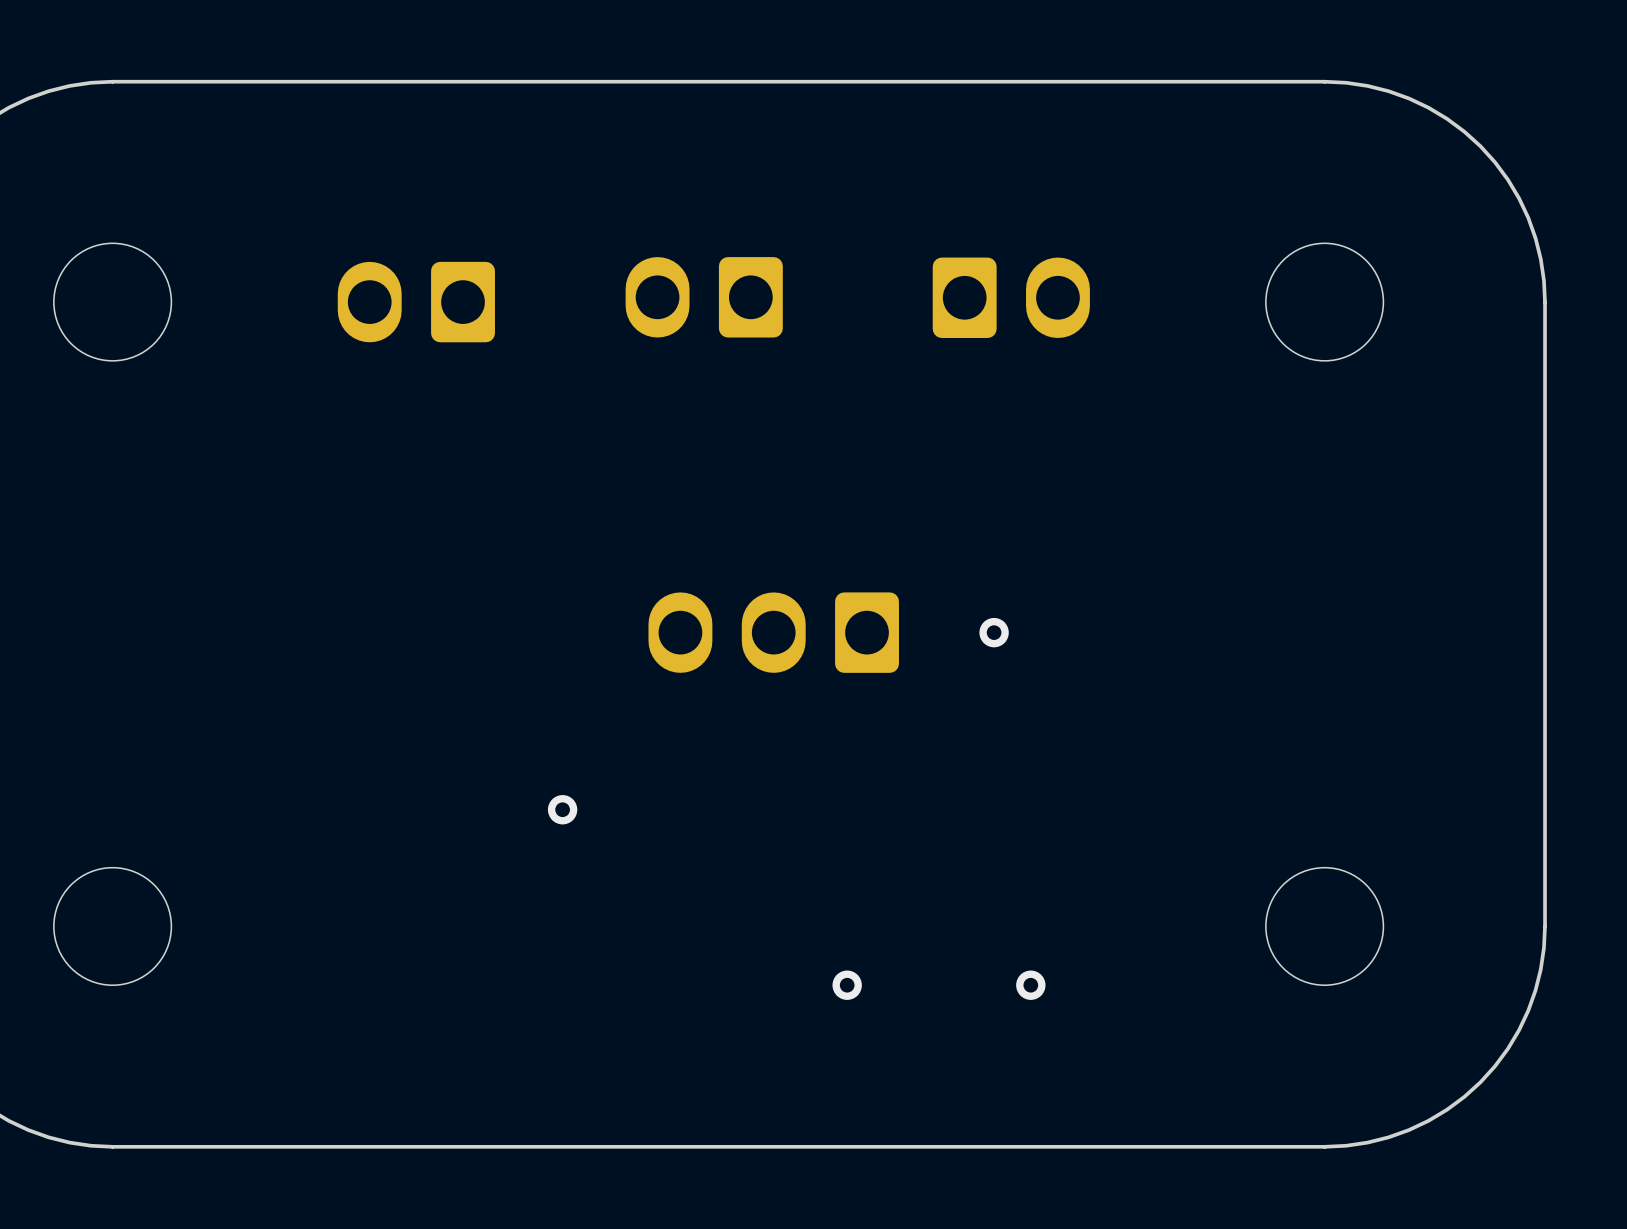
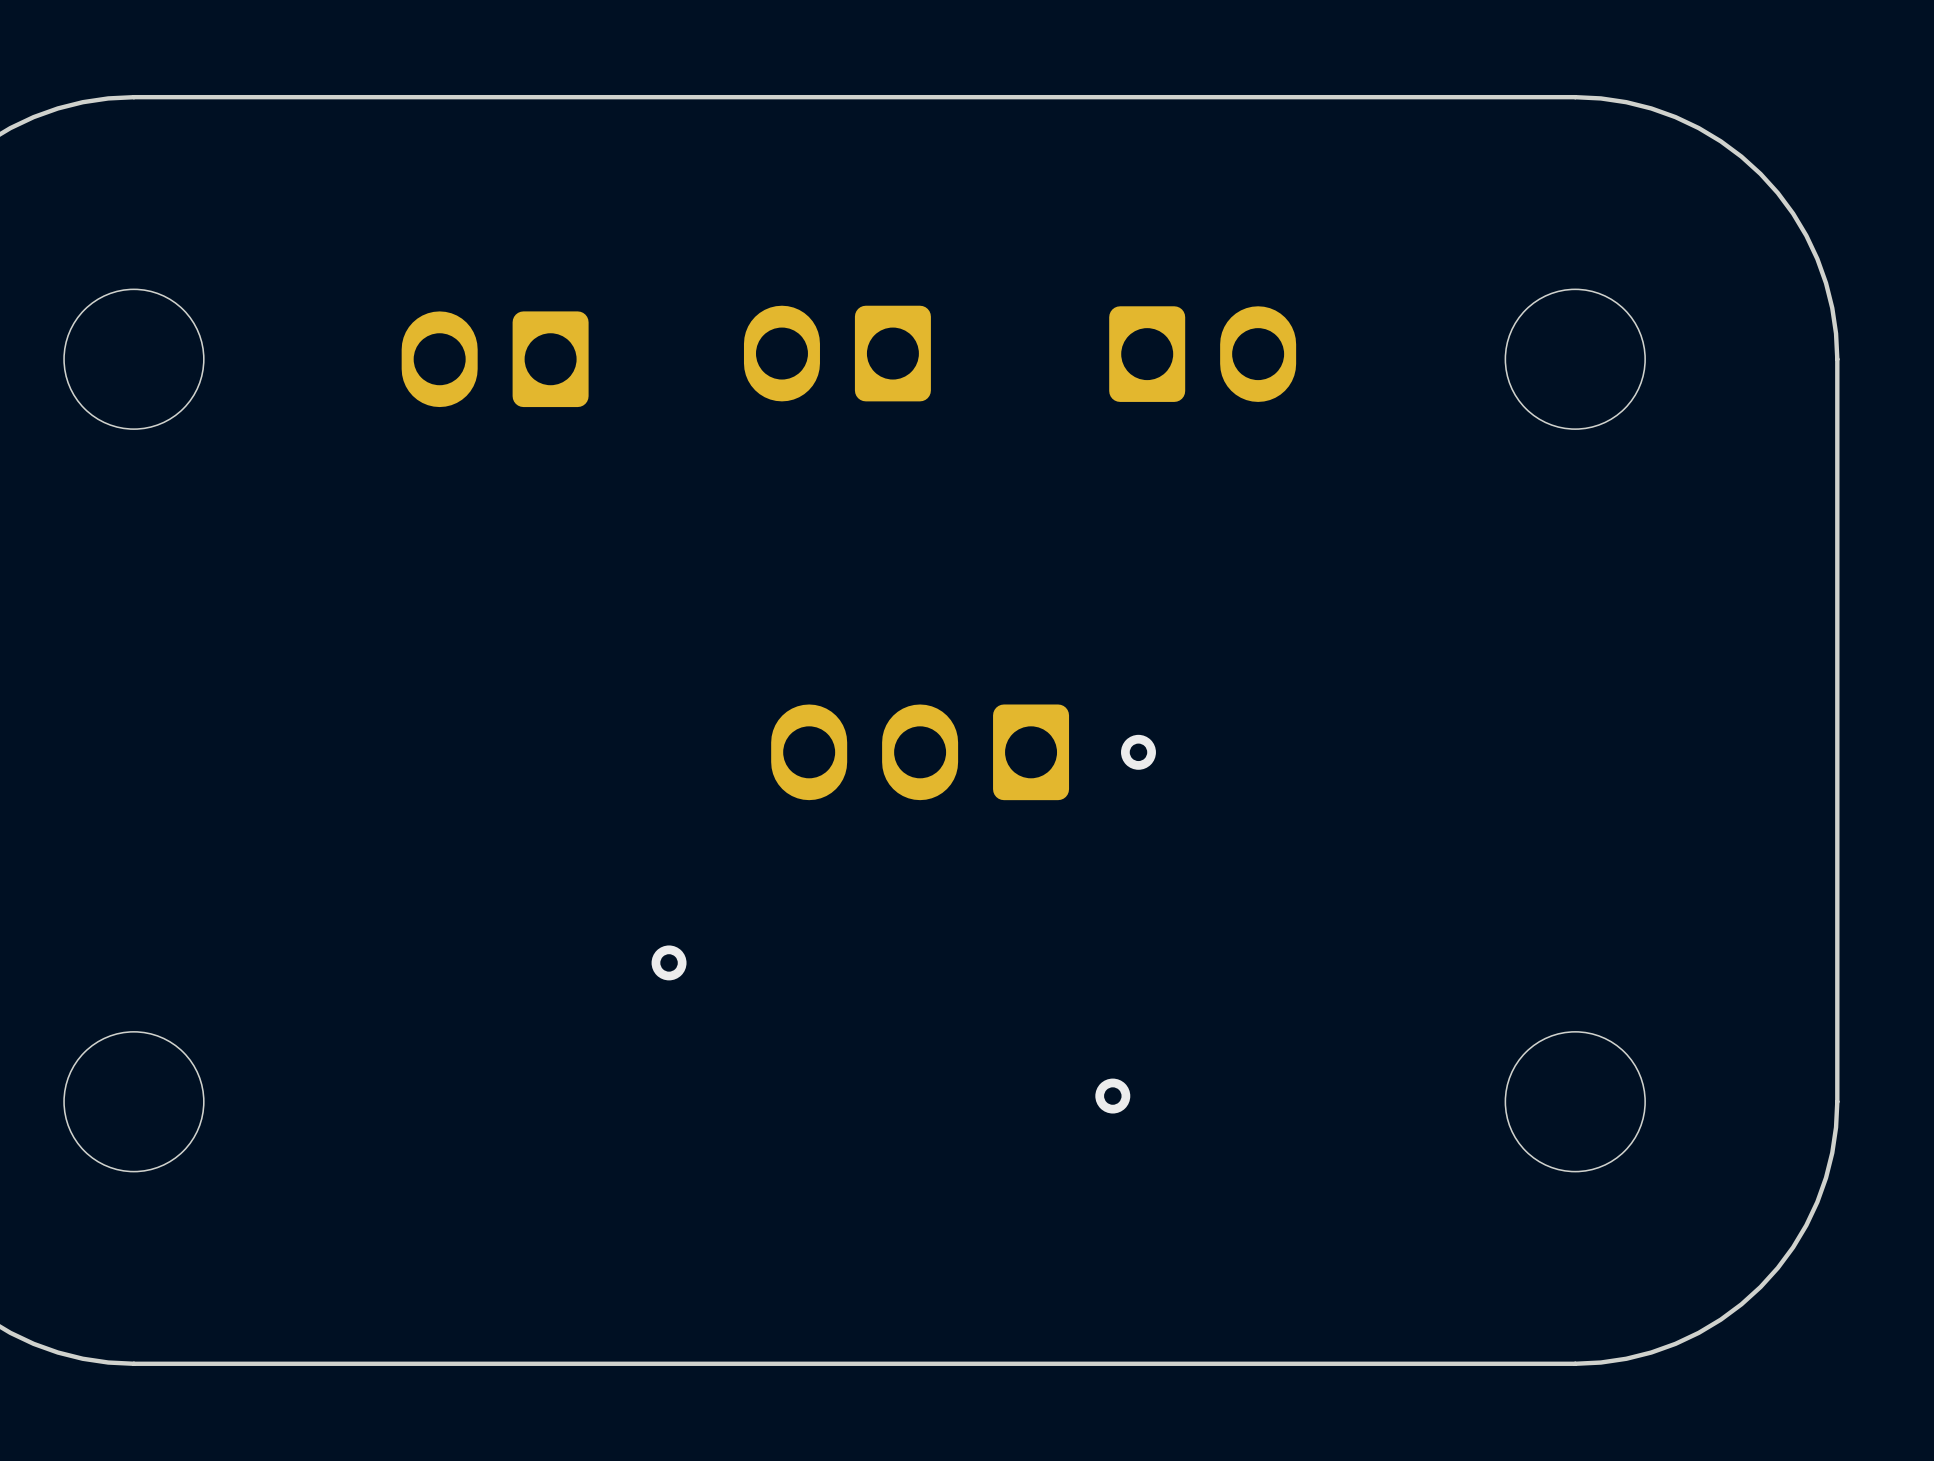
via position: (994, 632) -> (1138, 752)
via: none -> (1112, 1096)
via: (847, 985) -> none
via: (1030, 985) -> none

